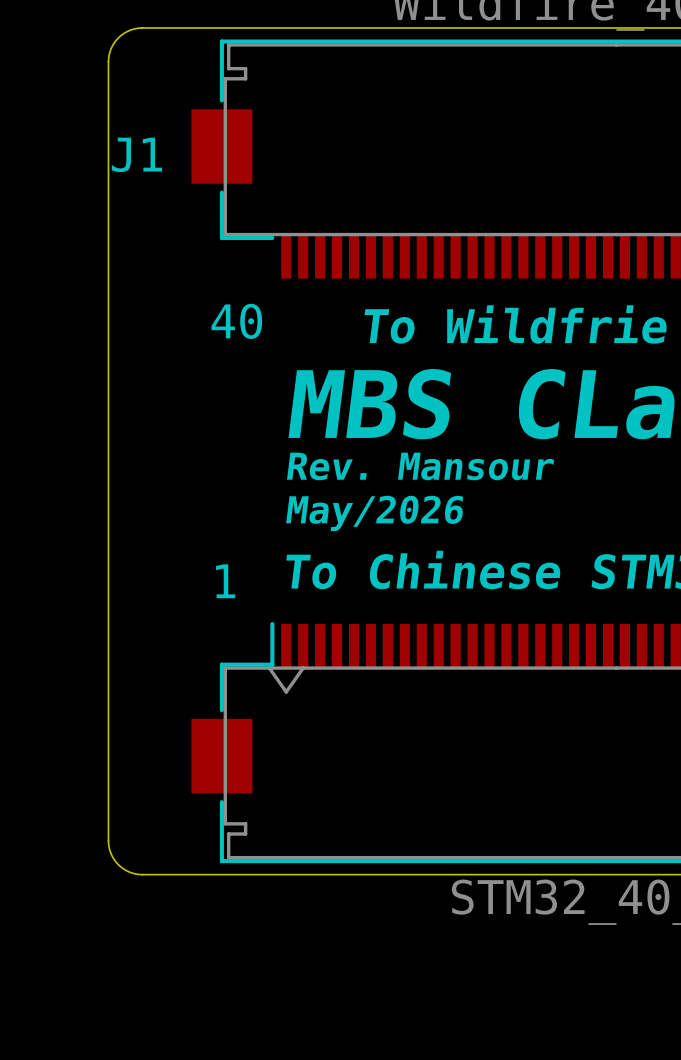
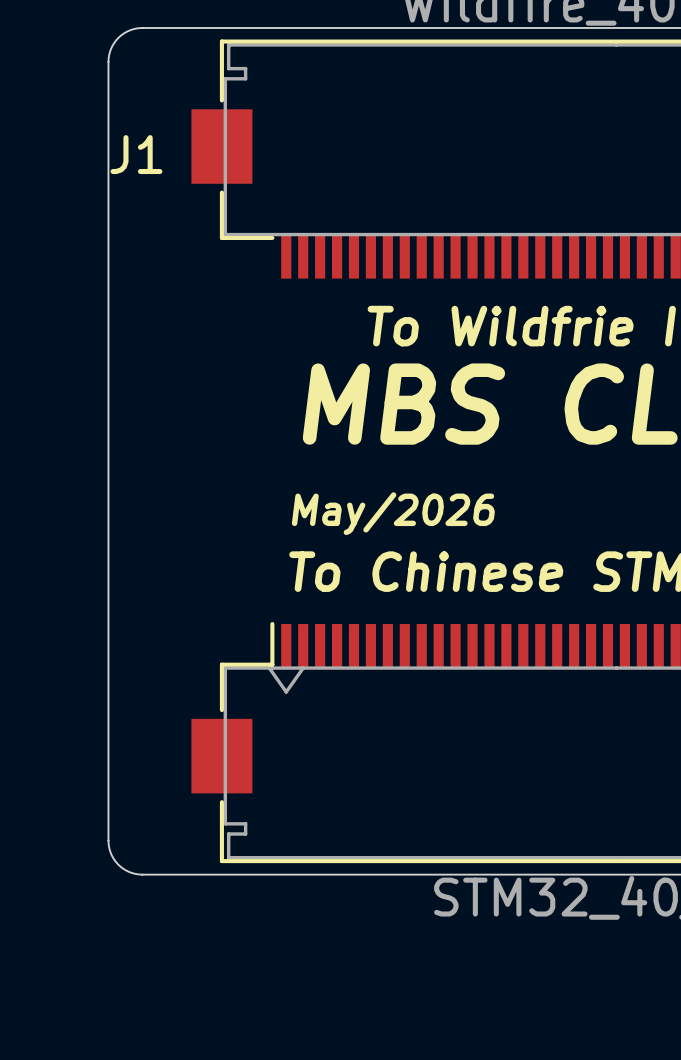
text: 40 (236, 321) -> none
text: Rev. Mansour (420, 466) -> none
text: 1 (225, 581) -> none

